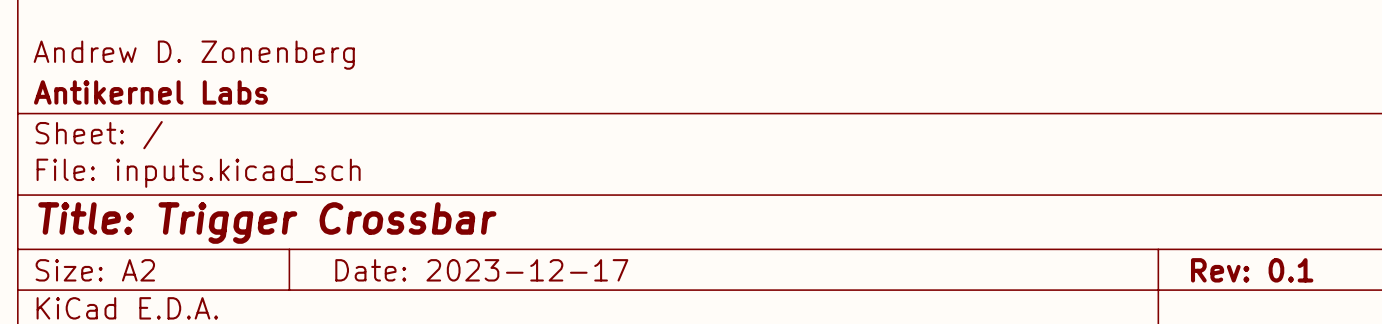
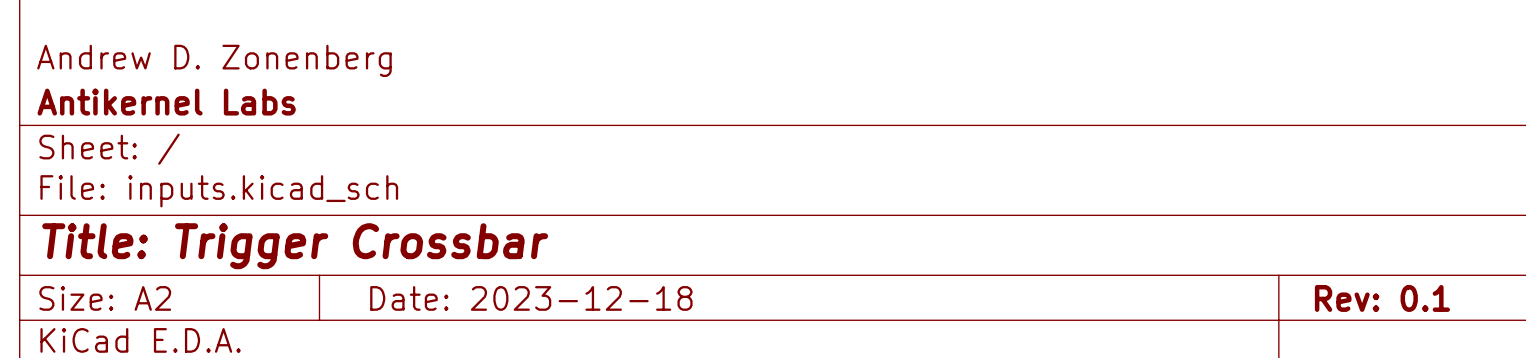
title block: Date: 2023-12-17 (481, 270) -> Date: 2023-12-18 (531, 298)

